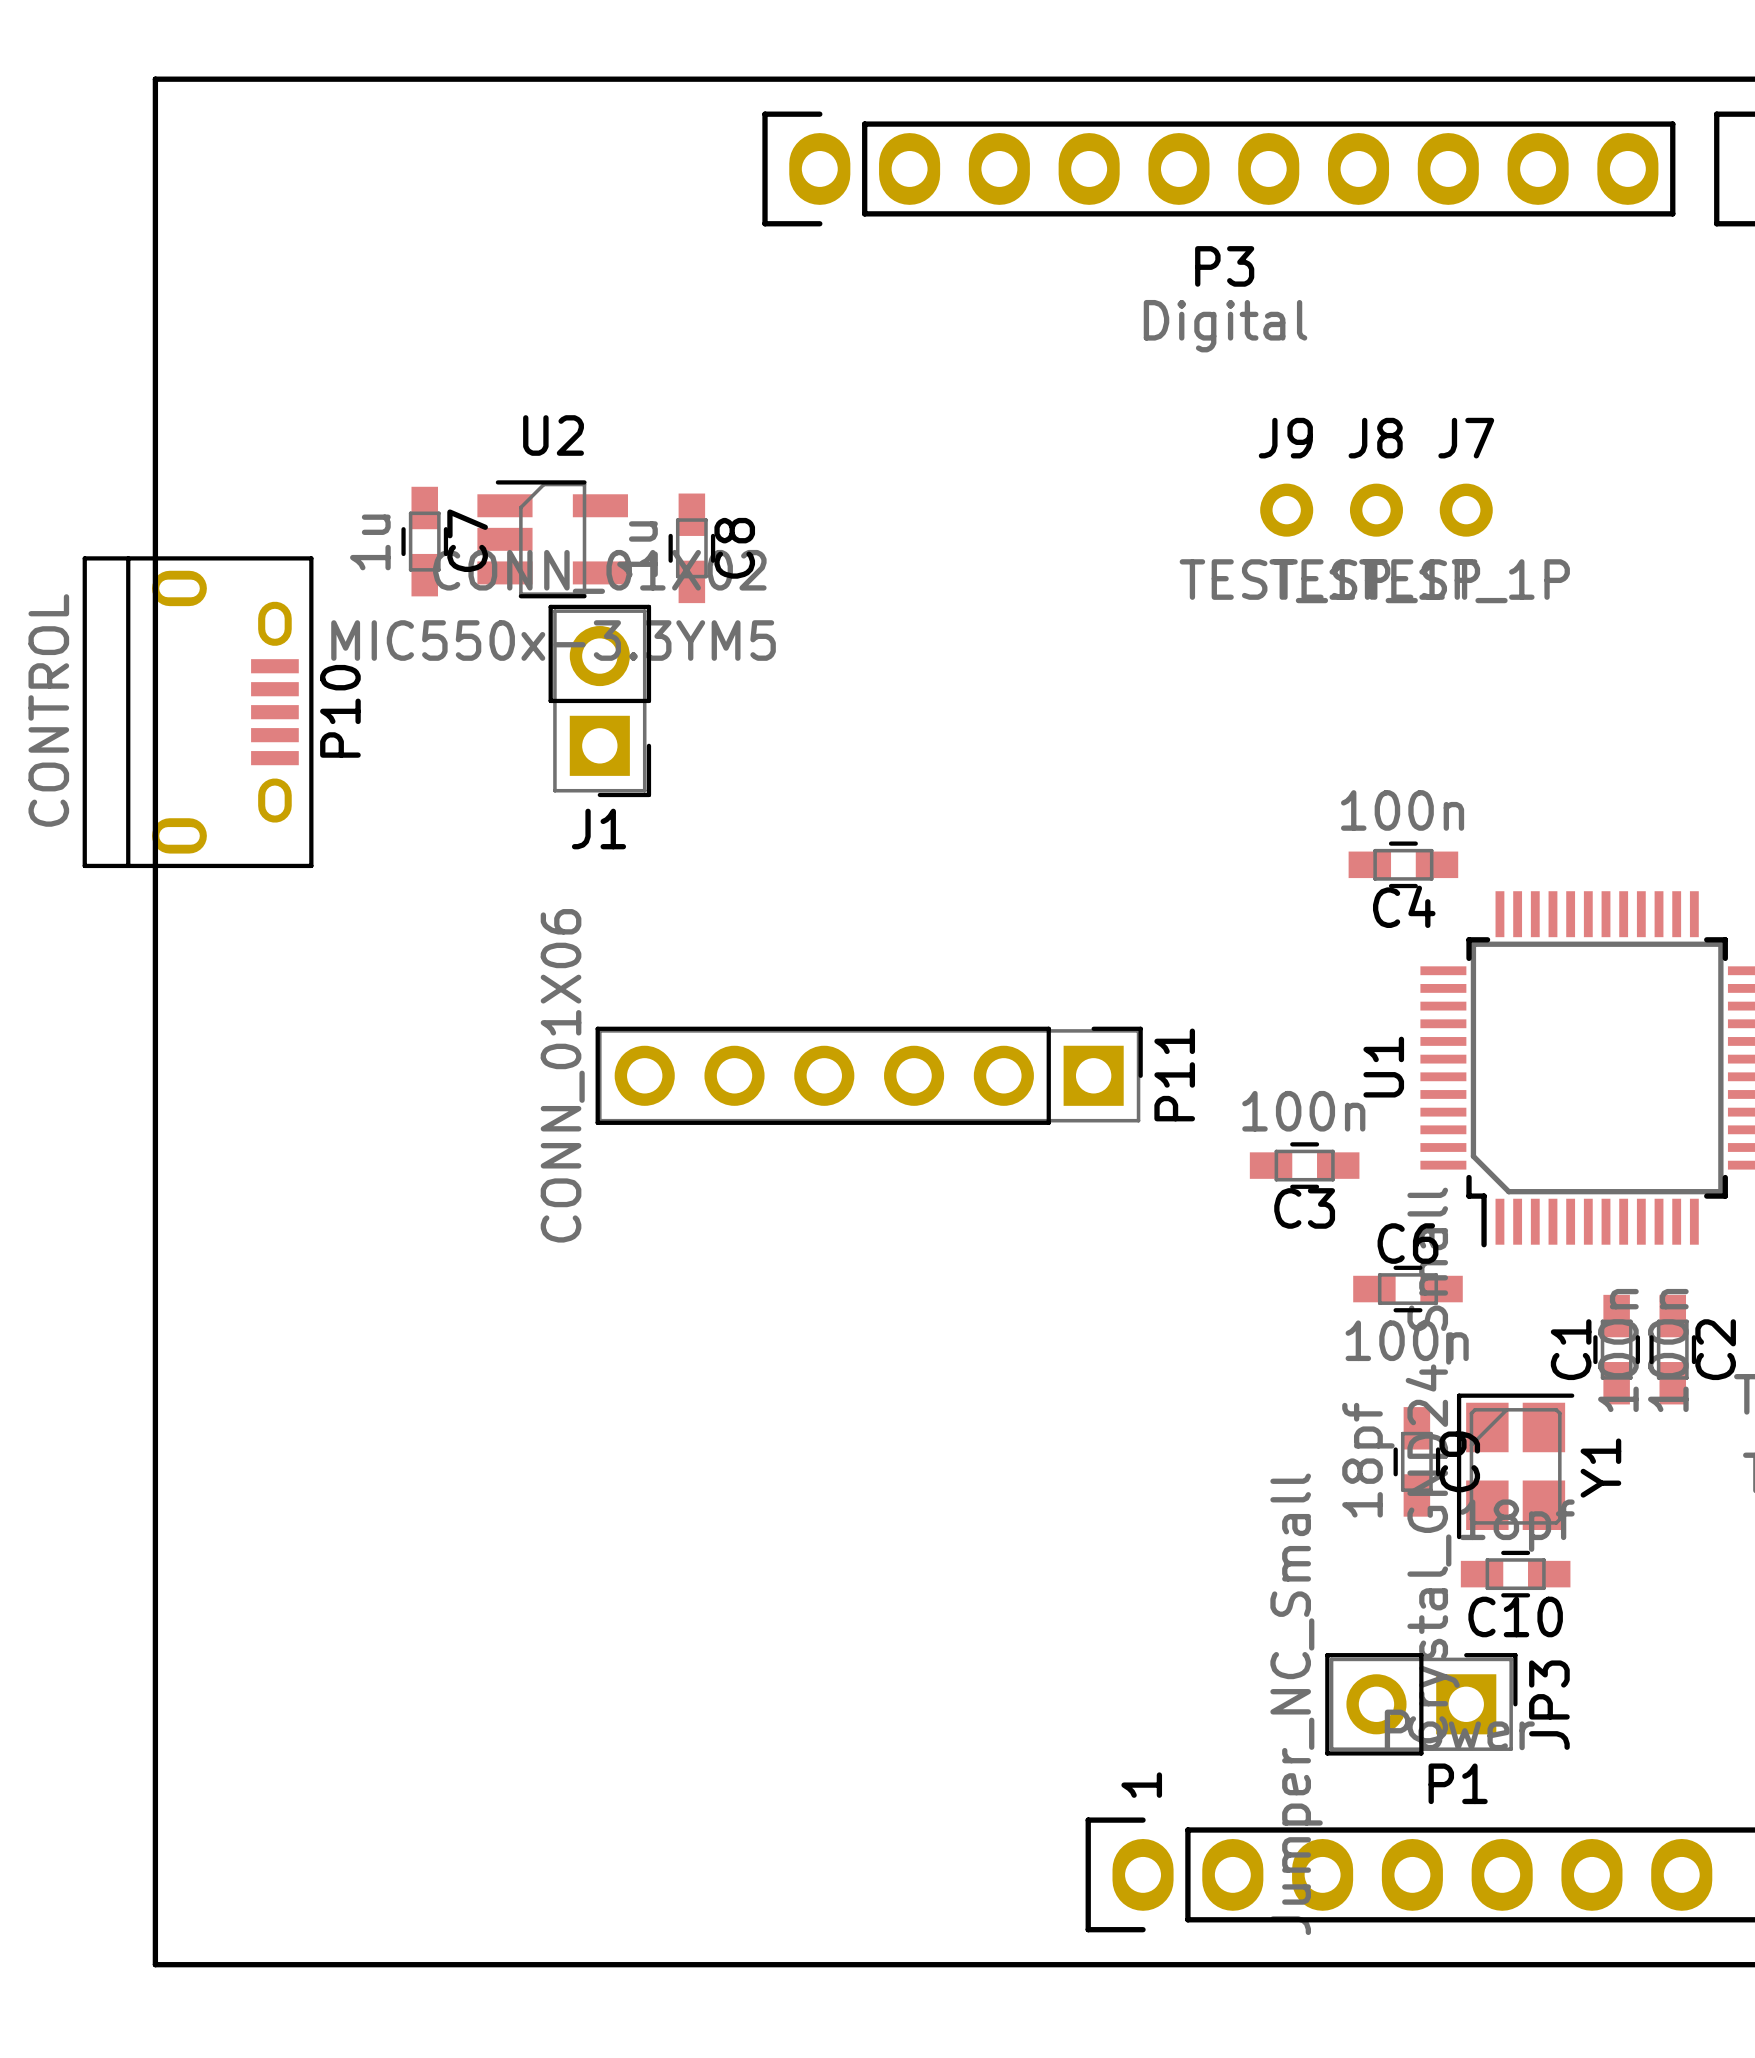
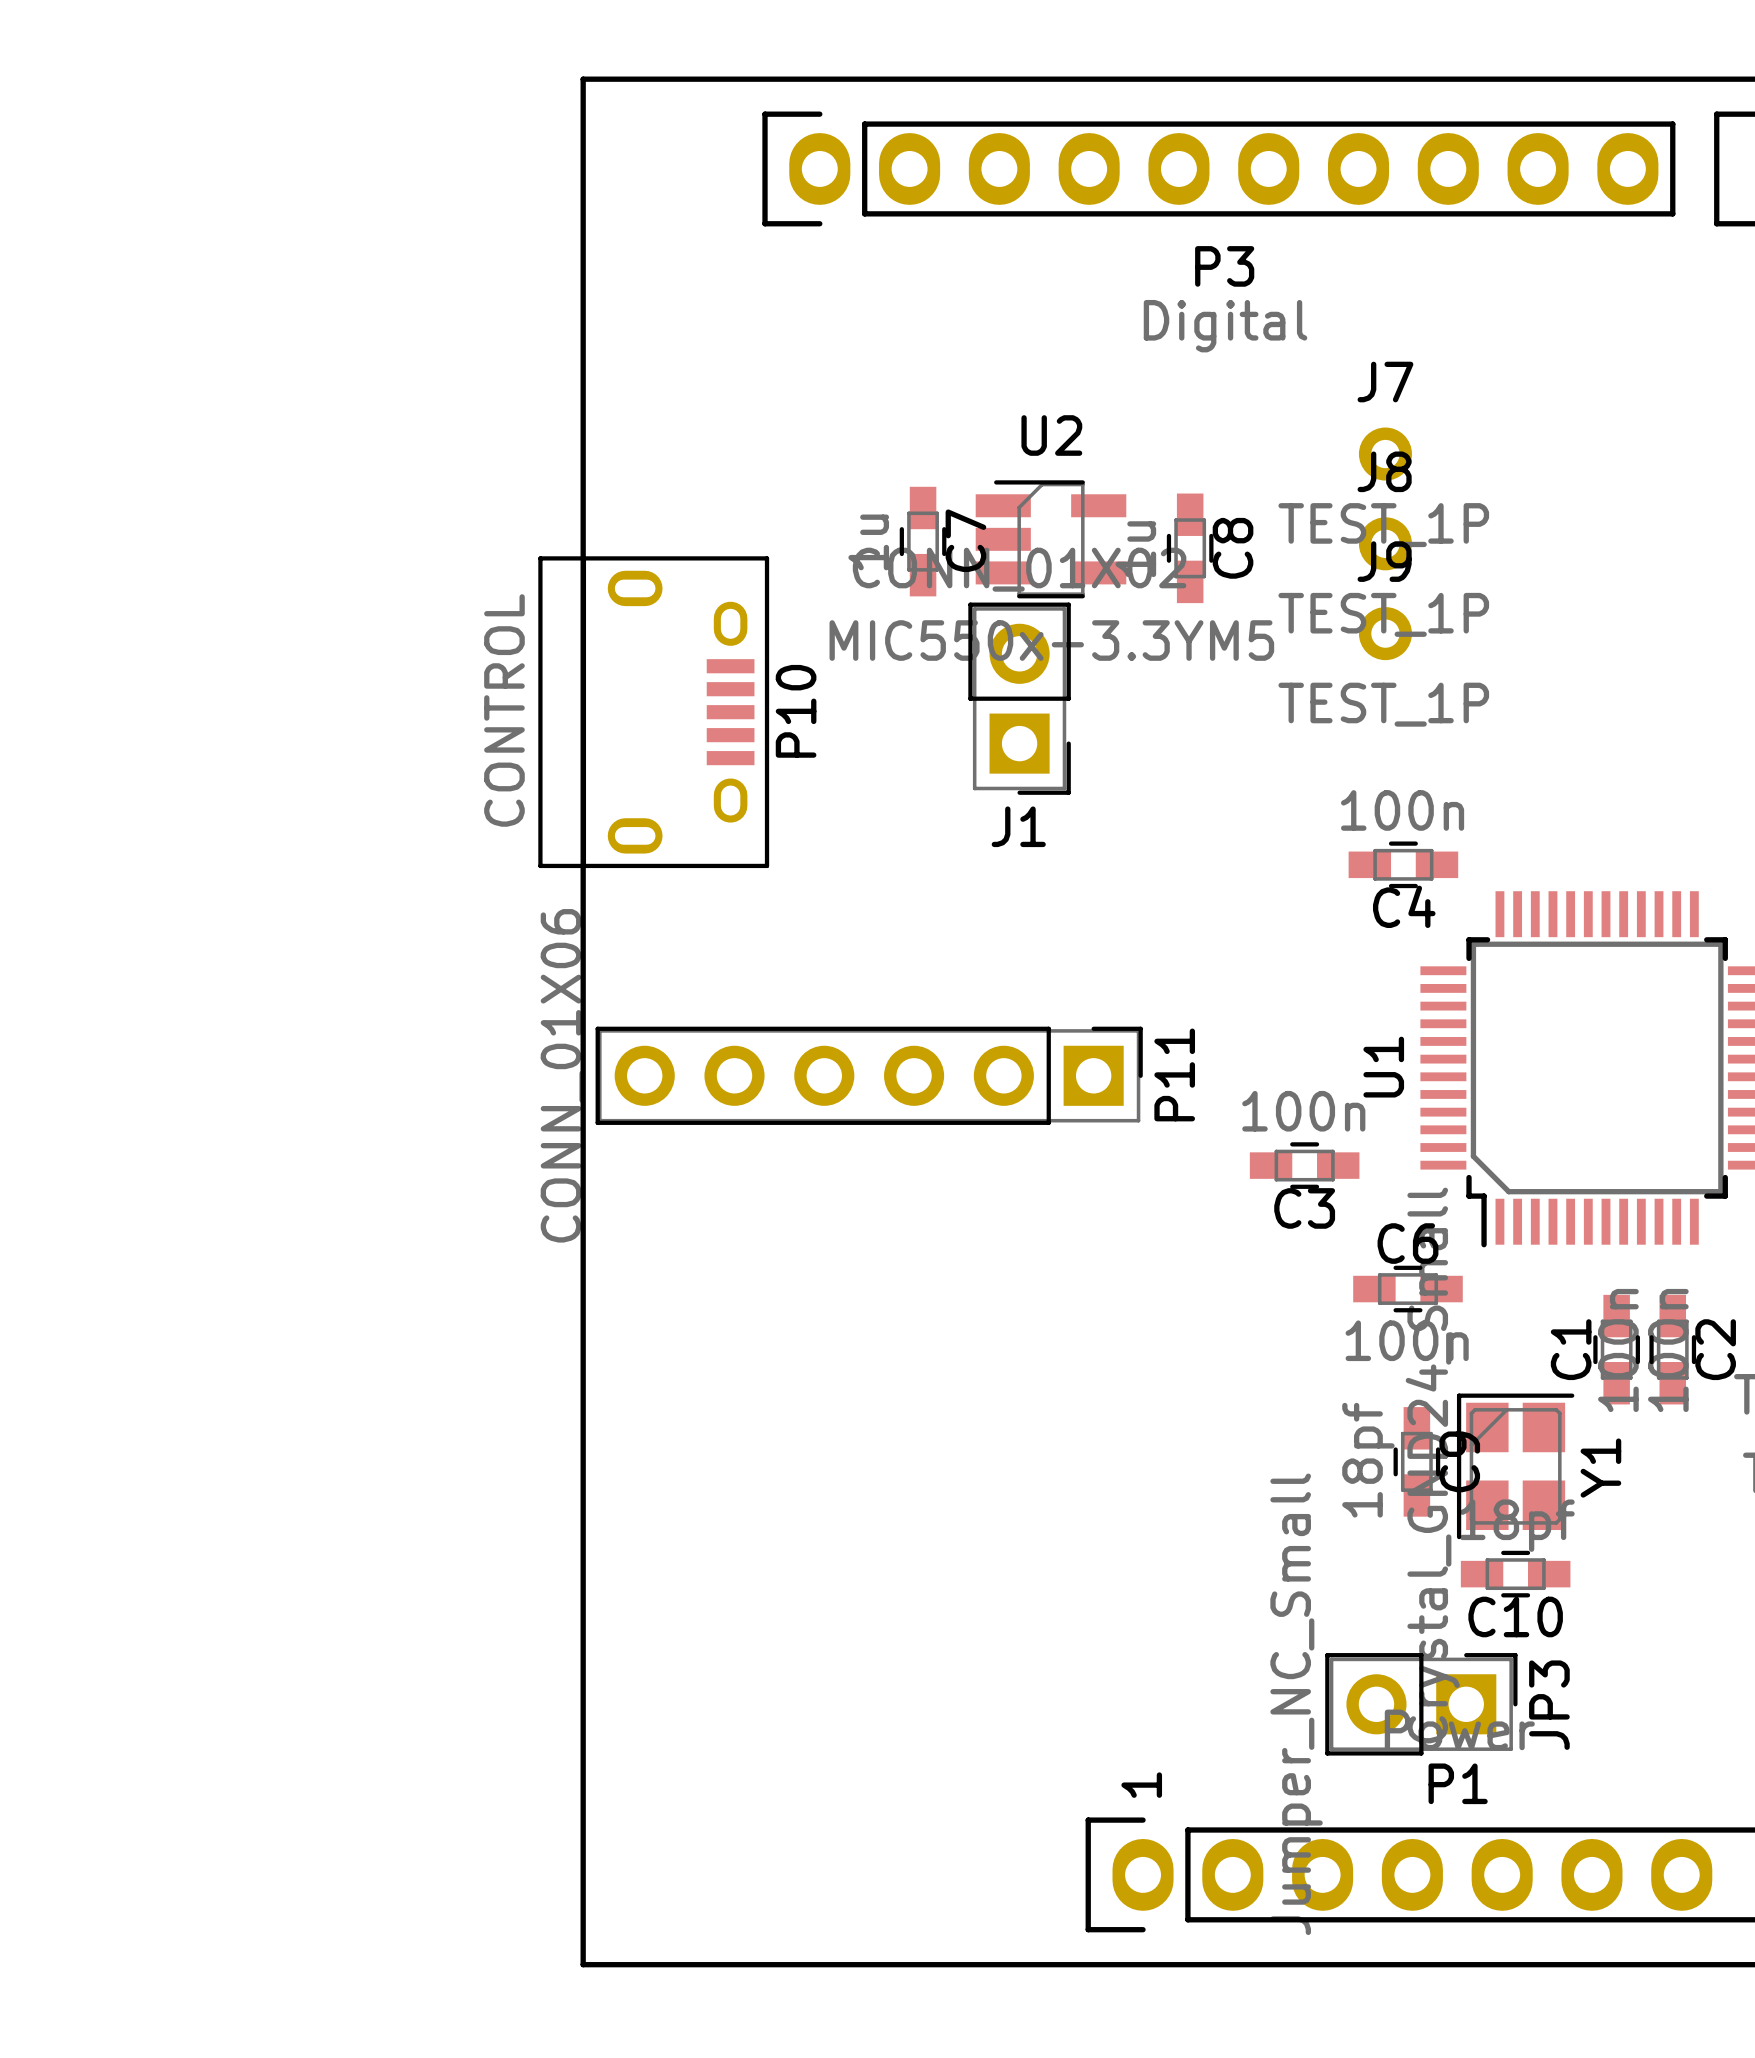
board edge: (583, 79) (155, 79) (155, 1964) (583, 1964) -> (583, 79) (583, 1964)
J9 position: (1286, 510) -> (1385, 633)
J8 position: (1376, 510) -> (1385, 543)
J7 position: (1466, 510) -> (1385, 454)
U2 position: (552, 539) -> (1051, 539)
C7 position: (424, 541) -> (923, 541)
C8 position: (691, 548) -> (1190, 548)
J1 position: (599, 700) -> (1019, 698)
P10 position: (198, 712) -> (653, 712)

